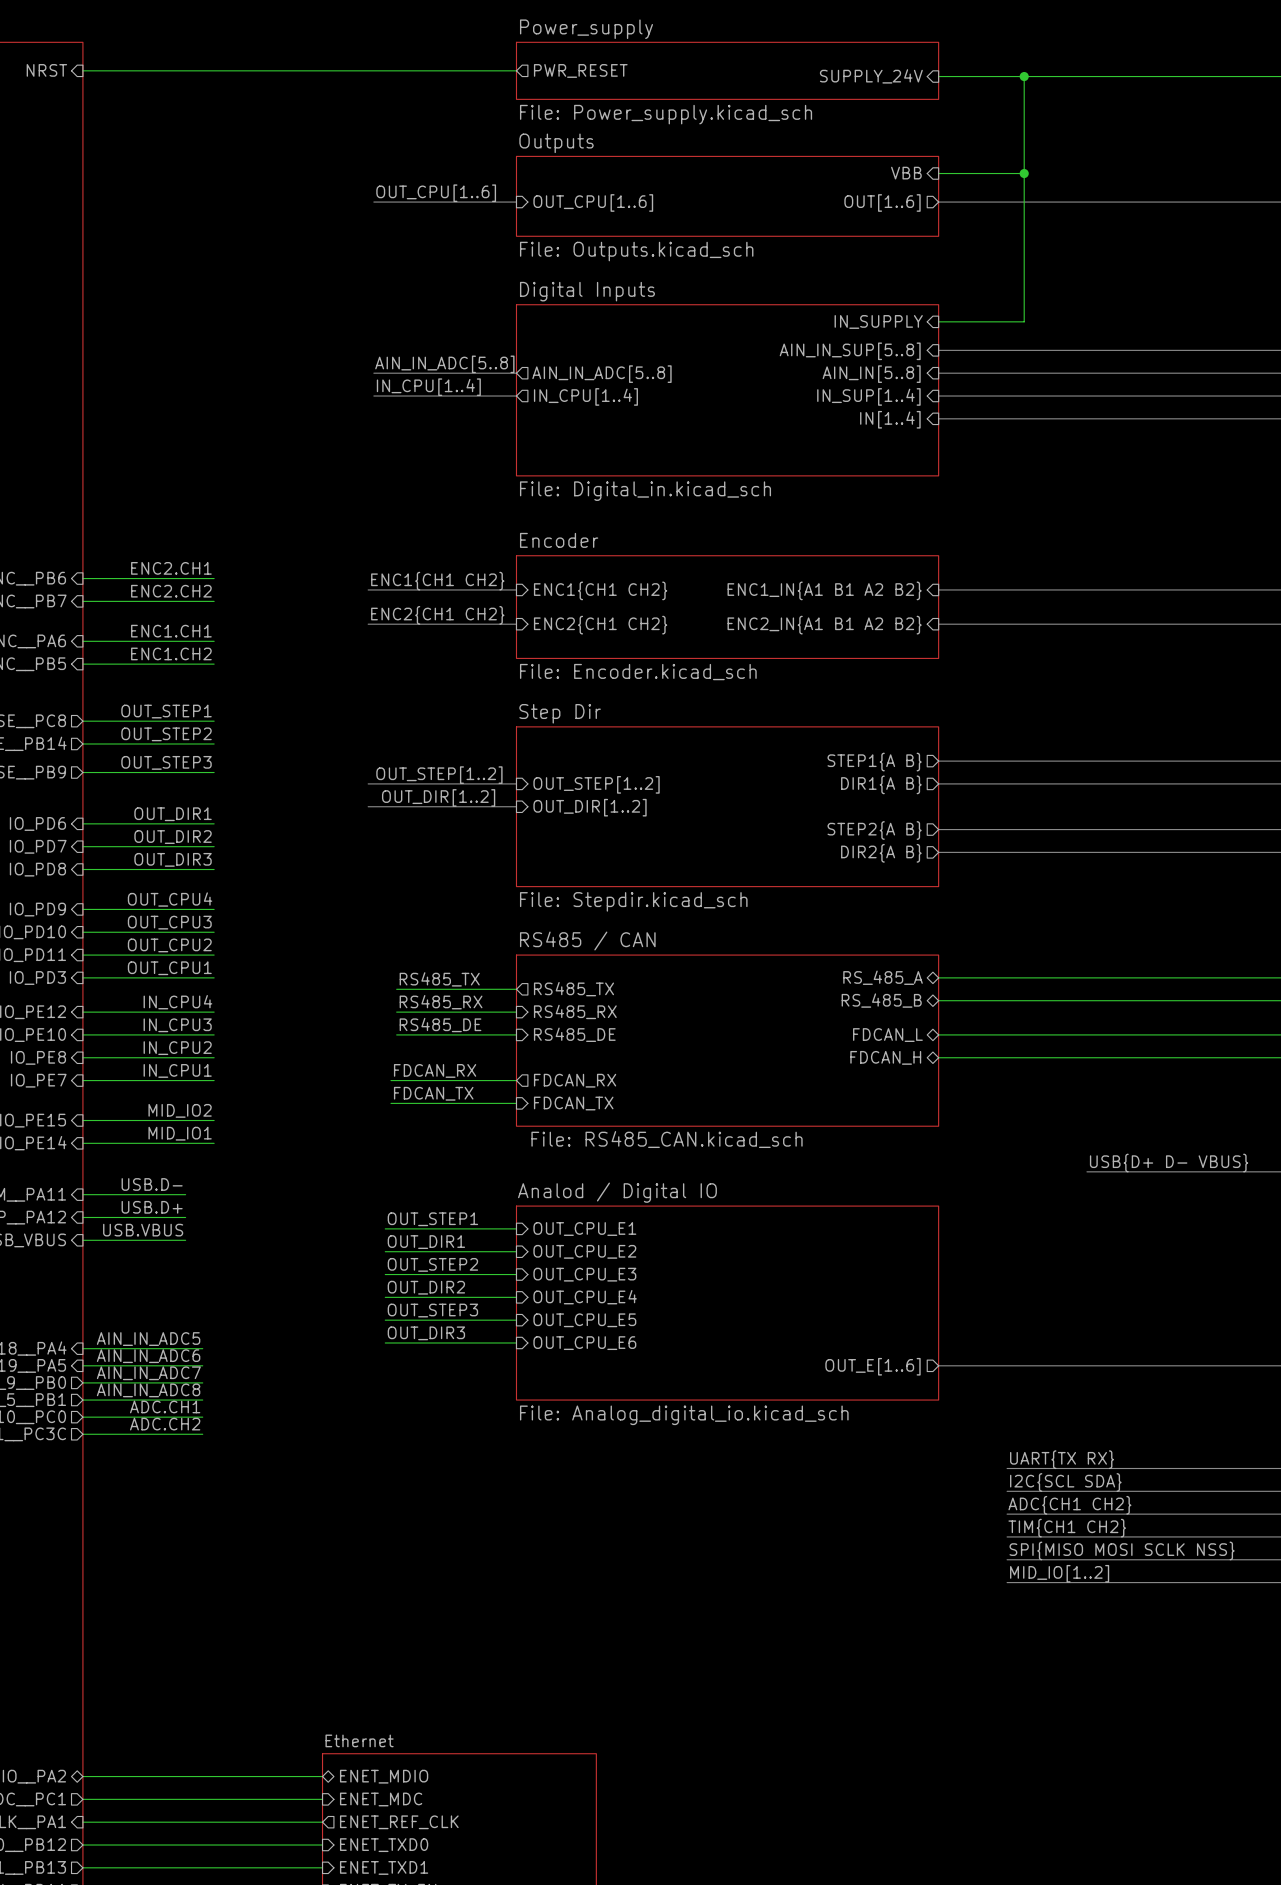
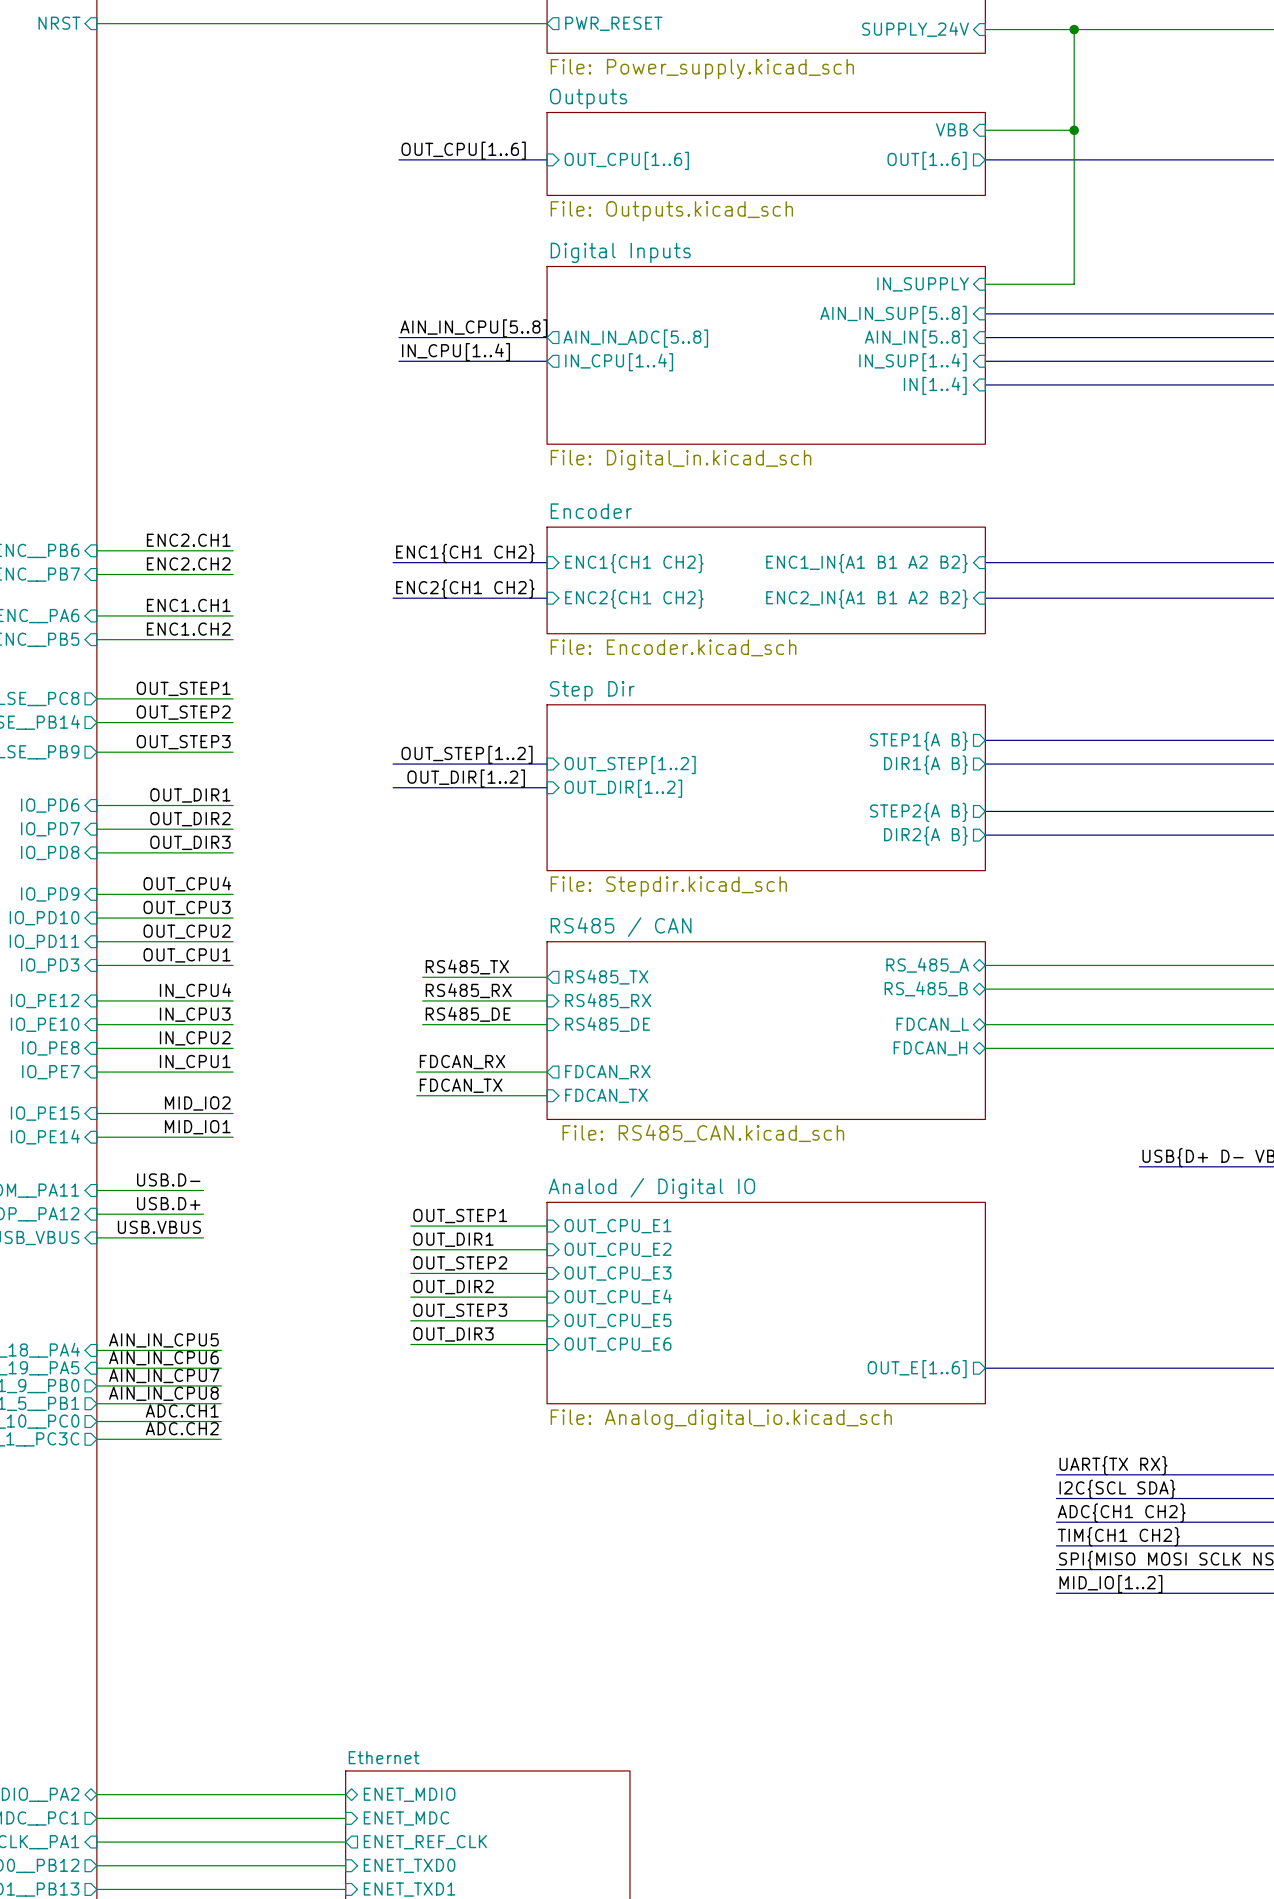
label: AIN_IN_ADC[5..8] (444, 364) -> AIN_IN_CPU[5..8] (473, 328)
label: AIN_IN_ADC5 (148, 1339) -> AIN_IN_CPU5 (163, 1340)
label: AIN_IN_ADC6 (148, 1356) -> AIN_IN_CPU6 (163, 1358)
label: AIN_IN_ADC7 (148, 1373) -> AIN_IN_CPU7 (164, 1375)
label: AIN_IN_ADC8 (148, 1390) -> AIN_IN_CPU8 (163, 1393)

